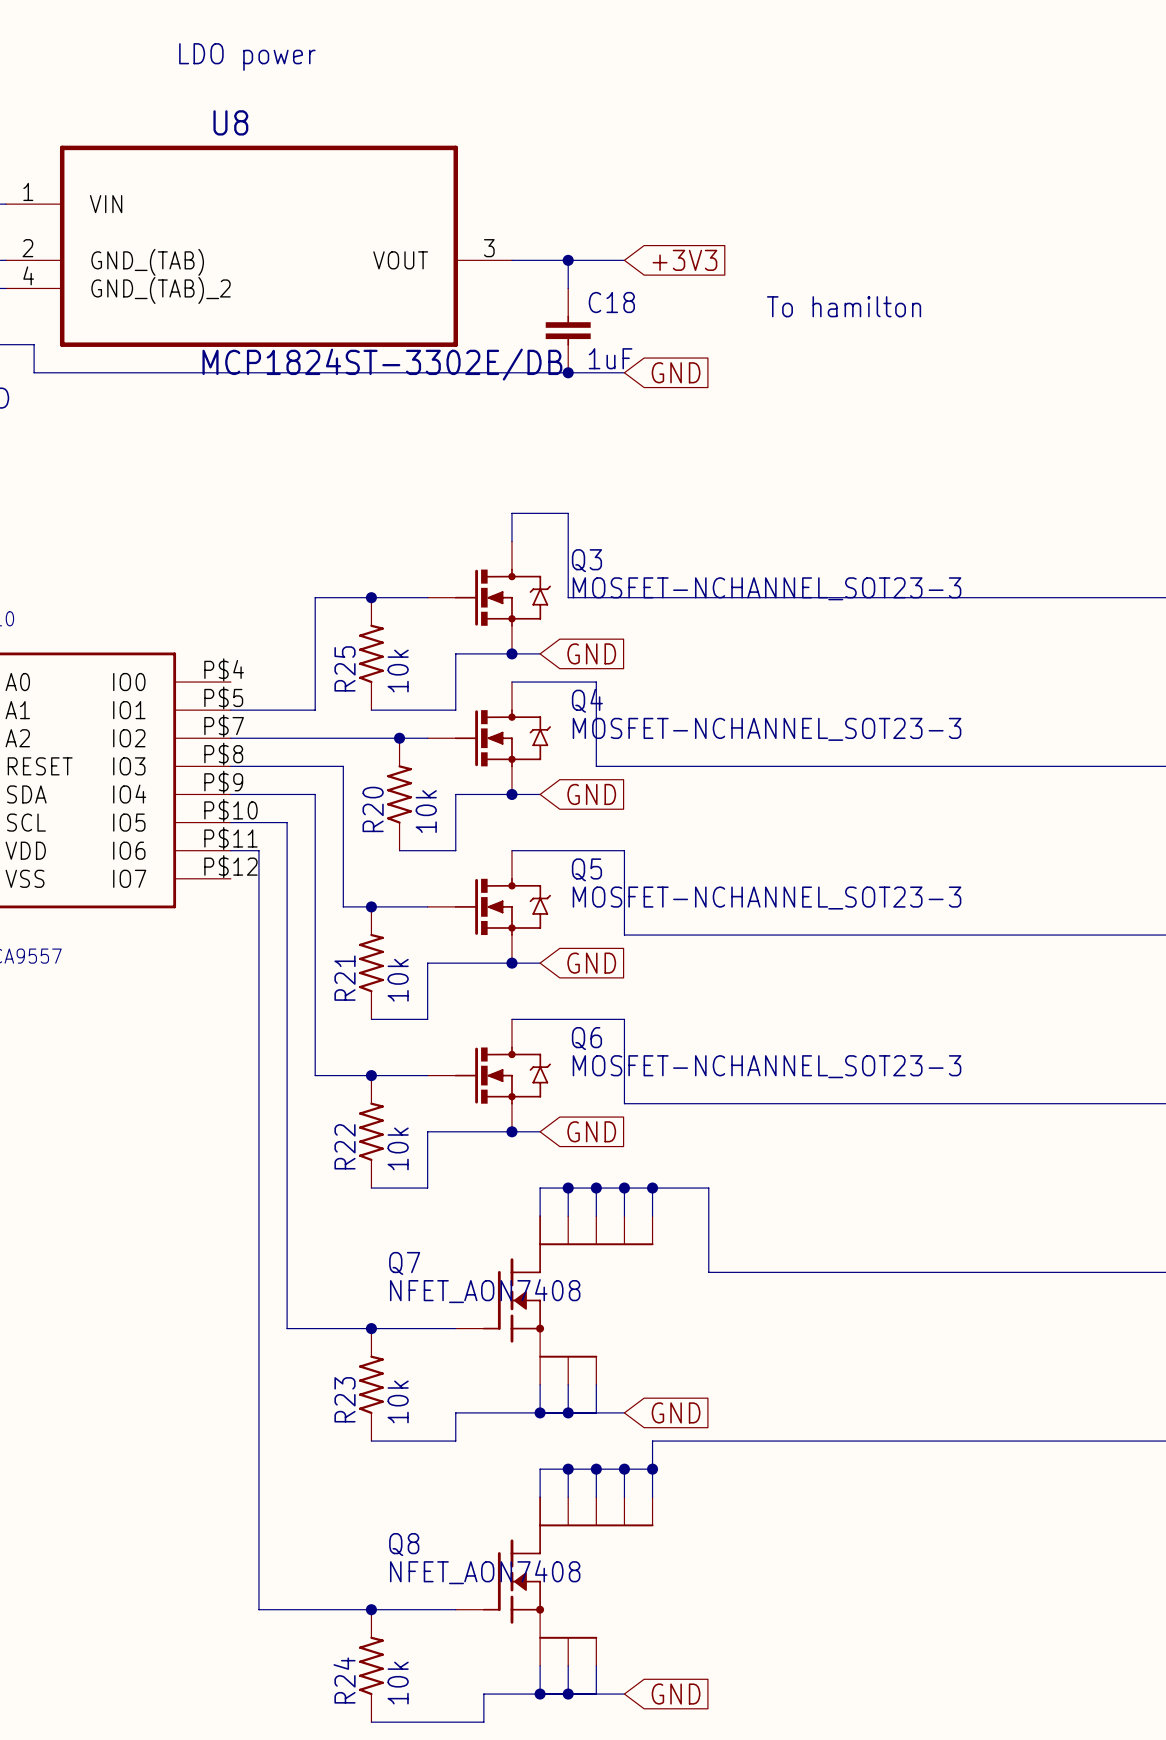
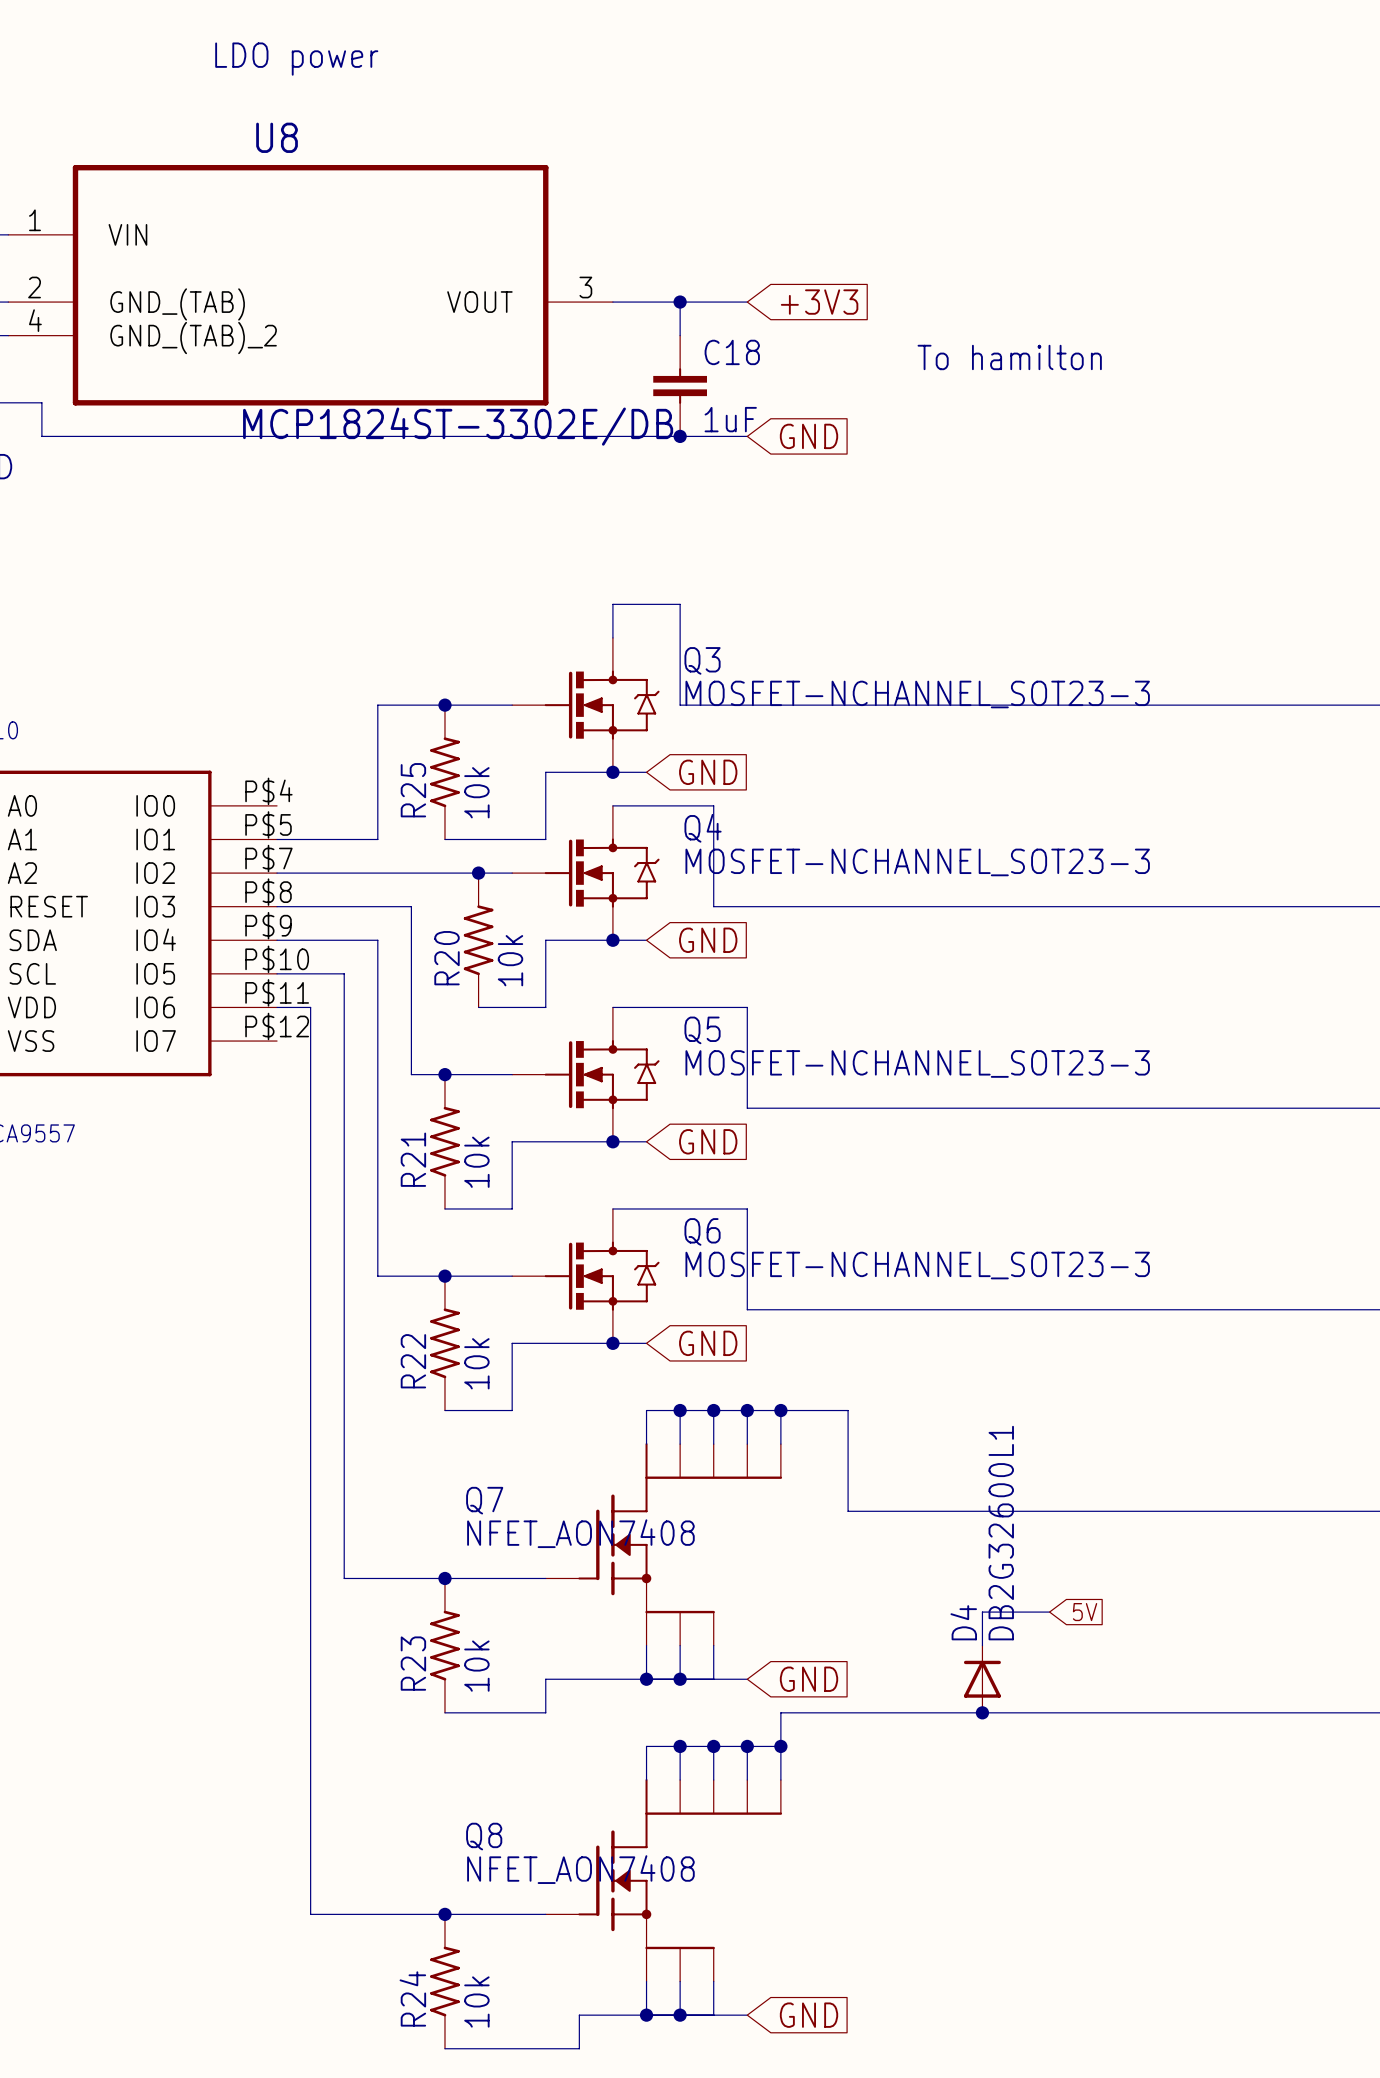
wire: none -> (1049, 1612) (982, 1612) (982, 1645)
global label: none -> 5V (1085, 1612)
D4: none -> DB2G32600L1 (982, 1679)
junction: none -> (982, 1712)

